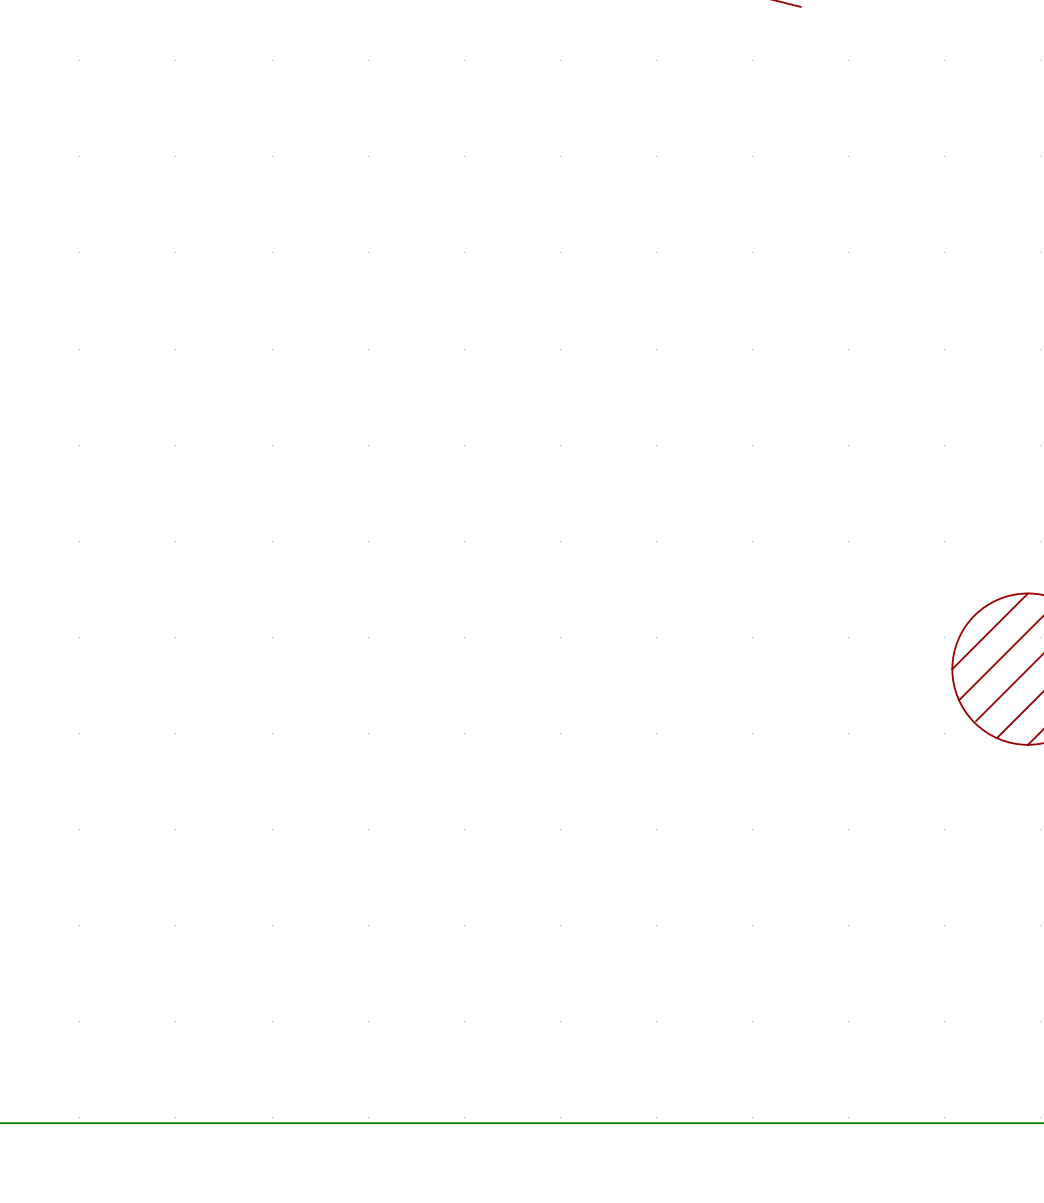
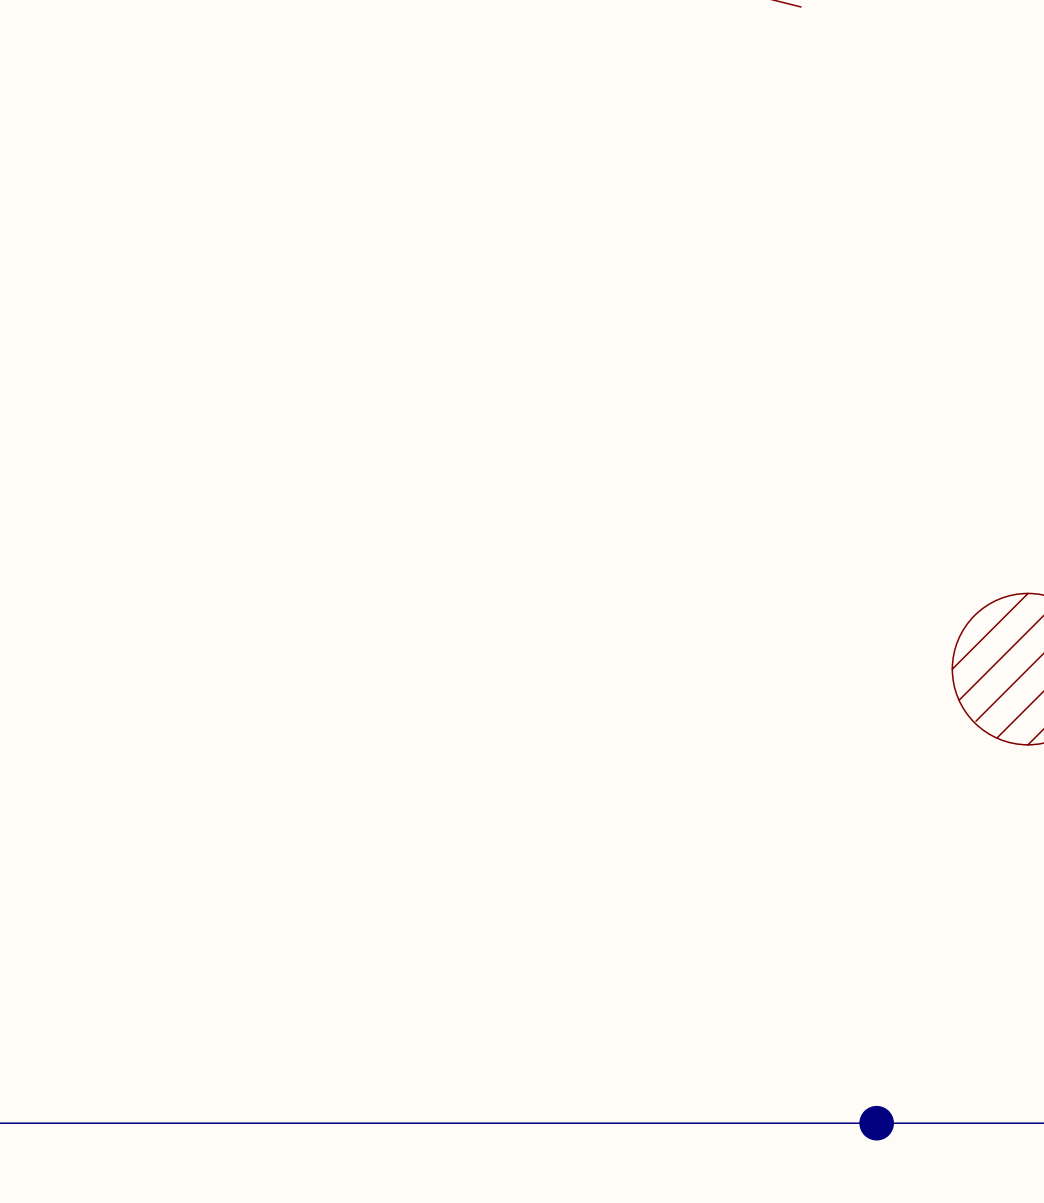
junction: none -> (876, 1123)

